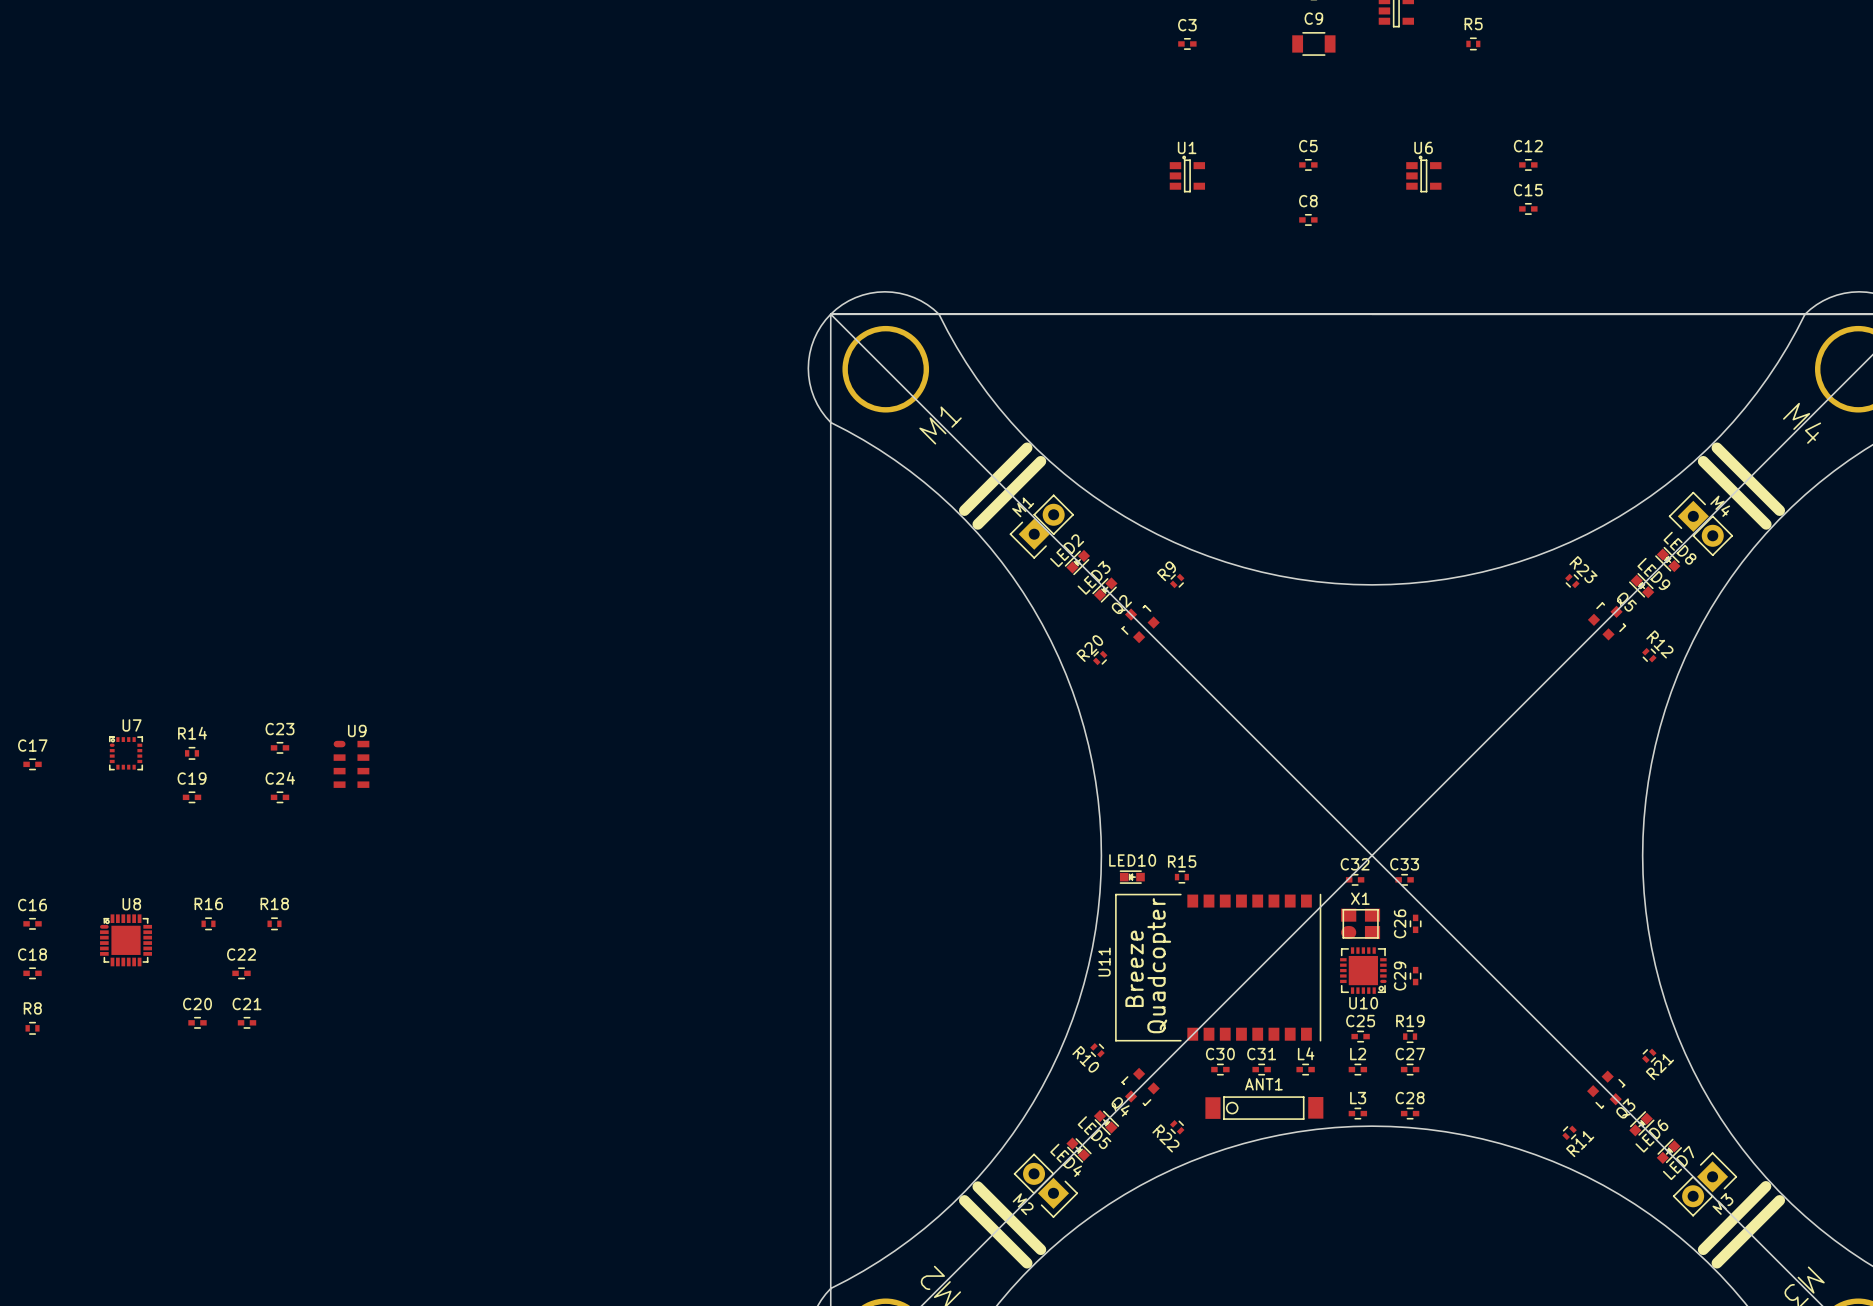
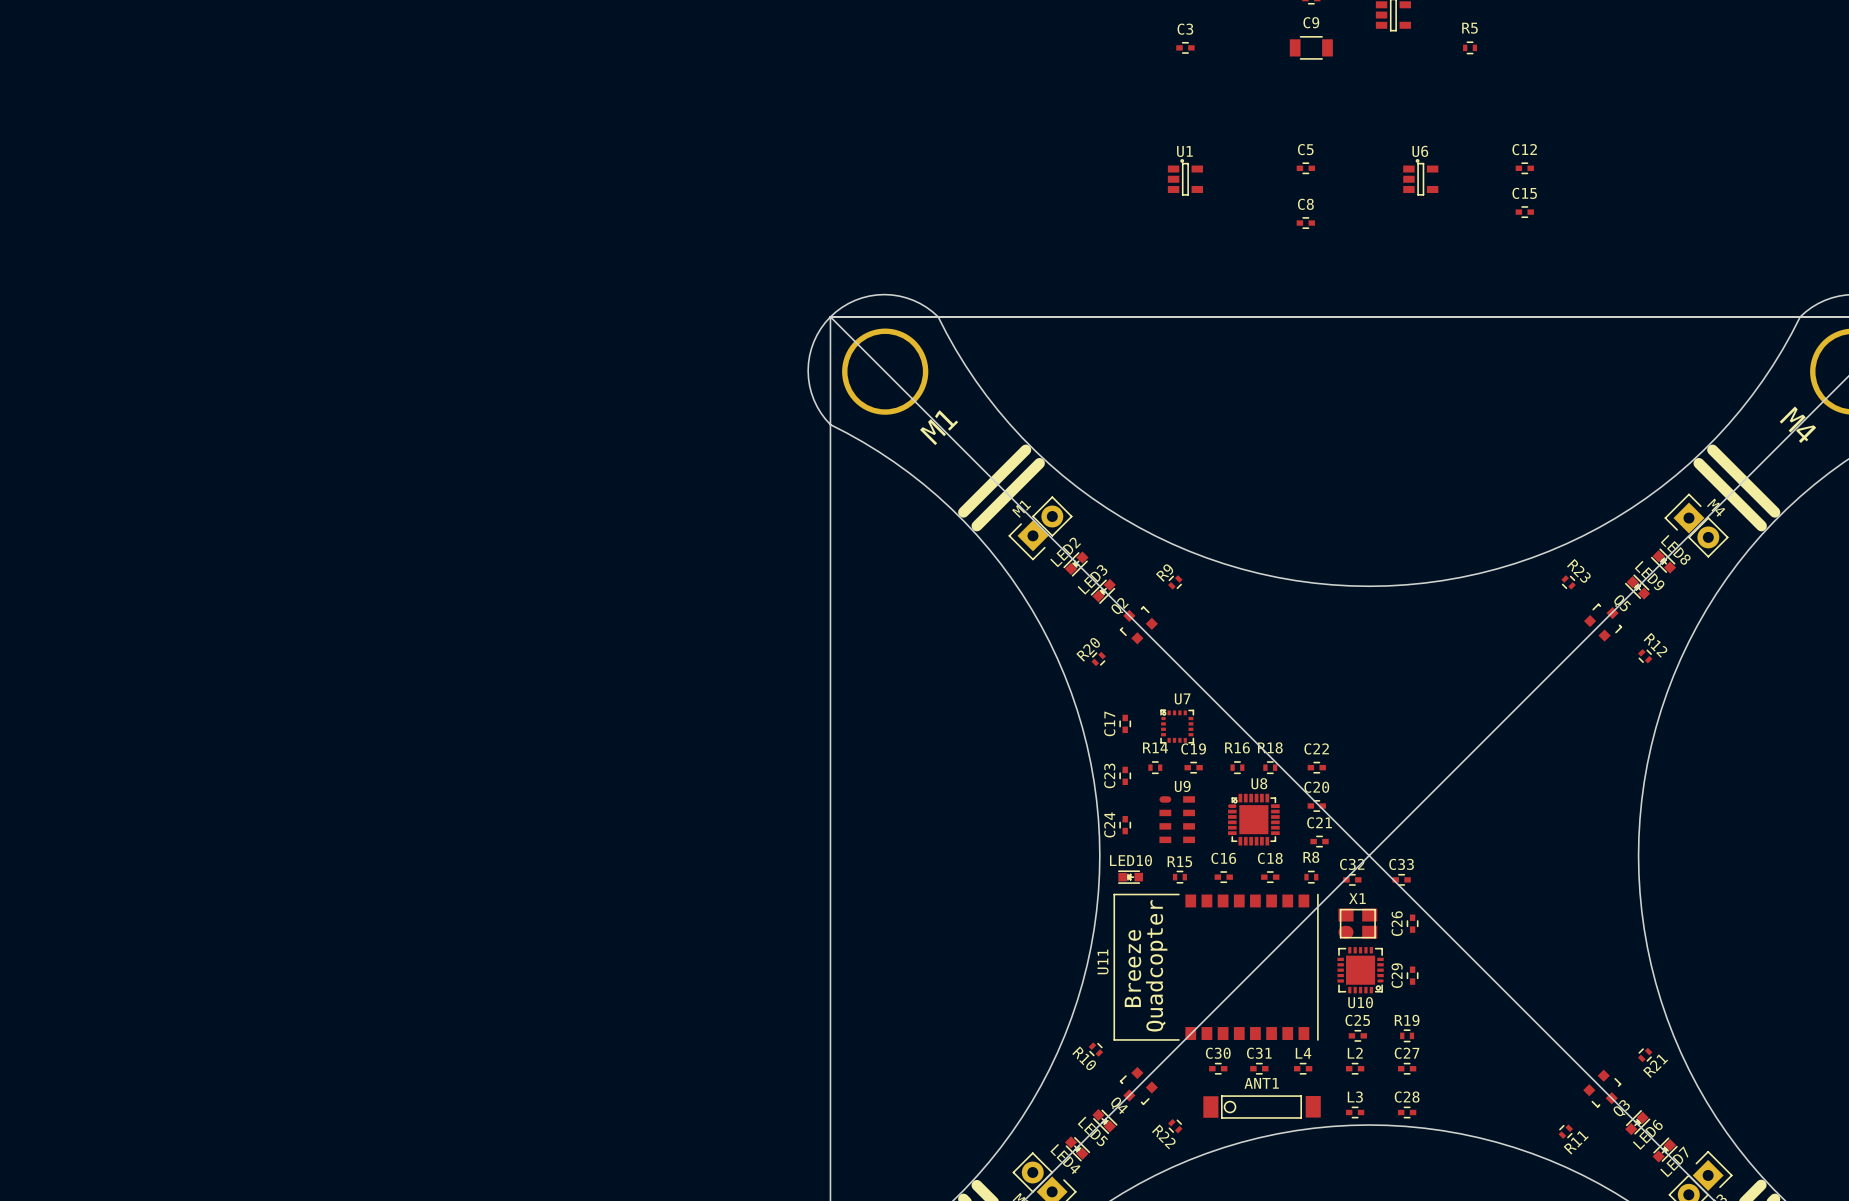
C23 name position: C23 (280, 729) -> C23 (1109, 775)
C17 name position: C17 (32, 745) -> C17 (1109, 723)
C23 rotation: 0° (280, 747) -> 90° clockwise (1125, 775)
C23 position: (280, 747) -> (1125, 775)
U7 position: (126, 753) -> (1177, 726)
R14 position: (192, 753) -> (1155, 767)
C17 rotation: 0° (32, 764) -> 90° clockwise (1125, 723)
C17 position: (32, 764) -> (1125, 723)
U9 position: (351, 764) -> (1177, 819)
C24 name position: C24 (280, 778) -> C24 (1109, 824)
C19 position: (192, 797) -> (1193, 767)
C24 rotation: 0° (280, 797) -> 90° clockwise (1125, 825)
C24 position: (280, 797) -> (1125, 825)
C16 position: (32, 923) -> (1223, 877)
R16 position: (208, 923) -> (1237, 767)
R18 position: (274, 923) -> (1270, 767)
U8 position: (126, 940) -> (1253, 819)
C18 position: (32, 973) -> (1270, 877)
C22 position: (241, 973) -> (1316, 767)
C20 position: (197, 1022) -> (1316, 805)
C21 position: (247, 1022) -> (1319, 841)
R8 position: (32, 1028) -> (1311, 877)

